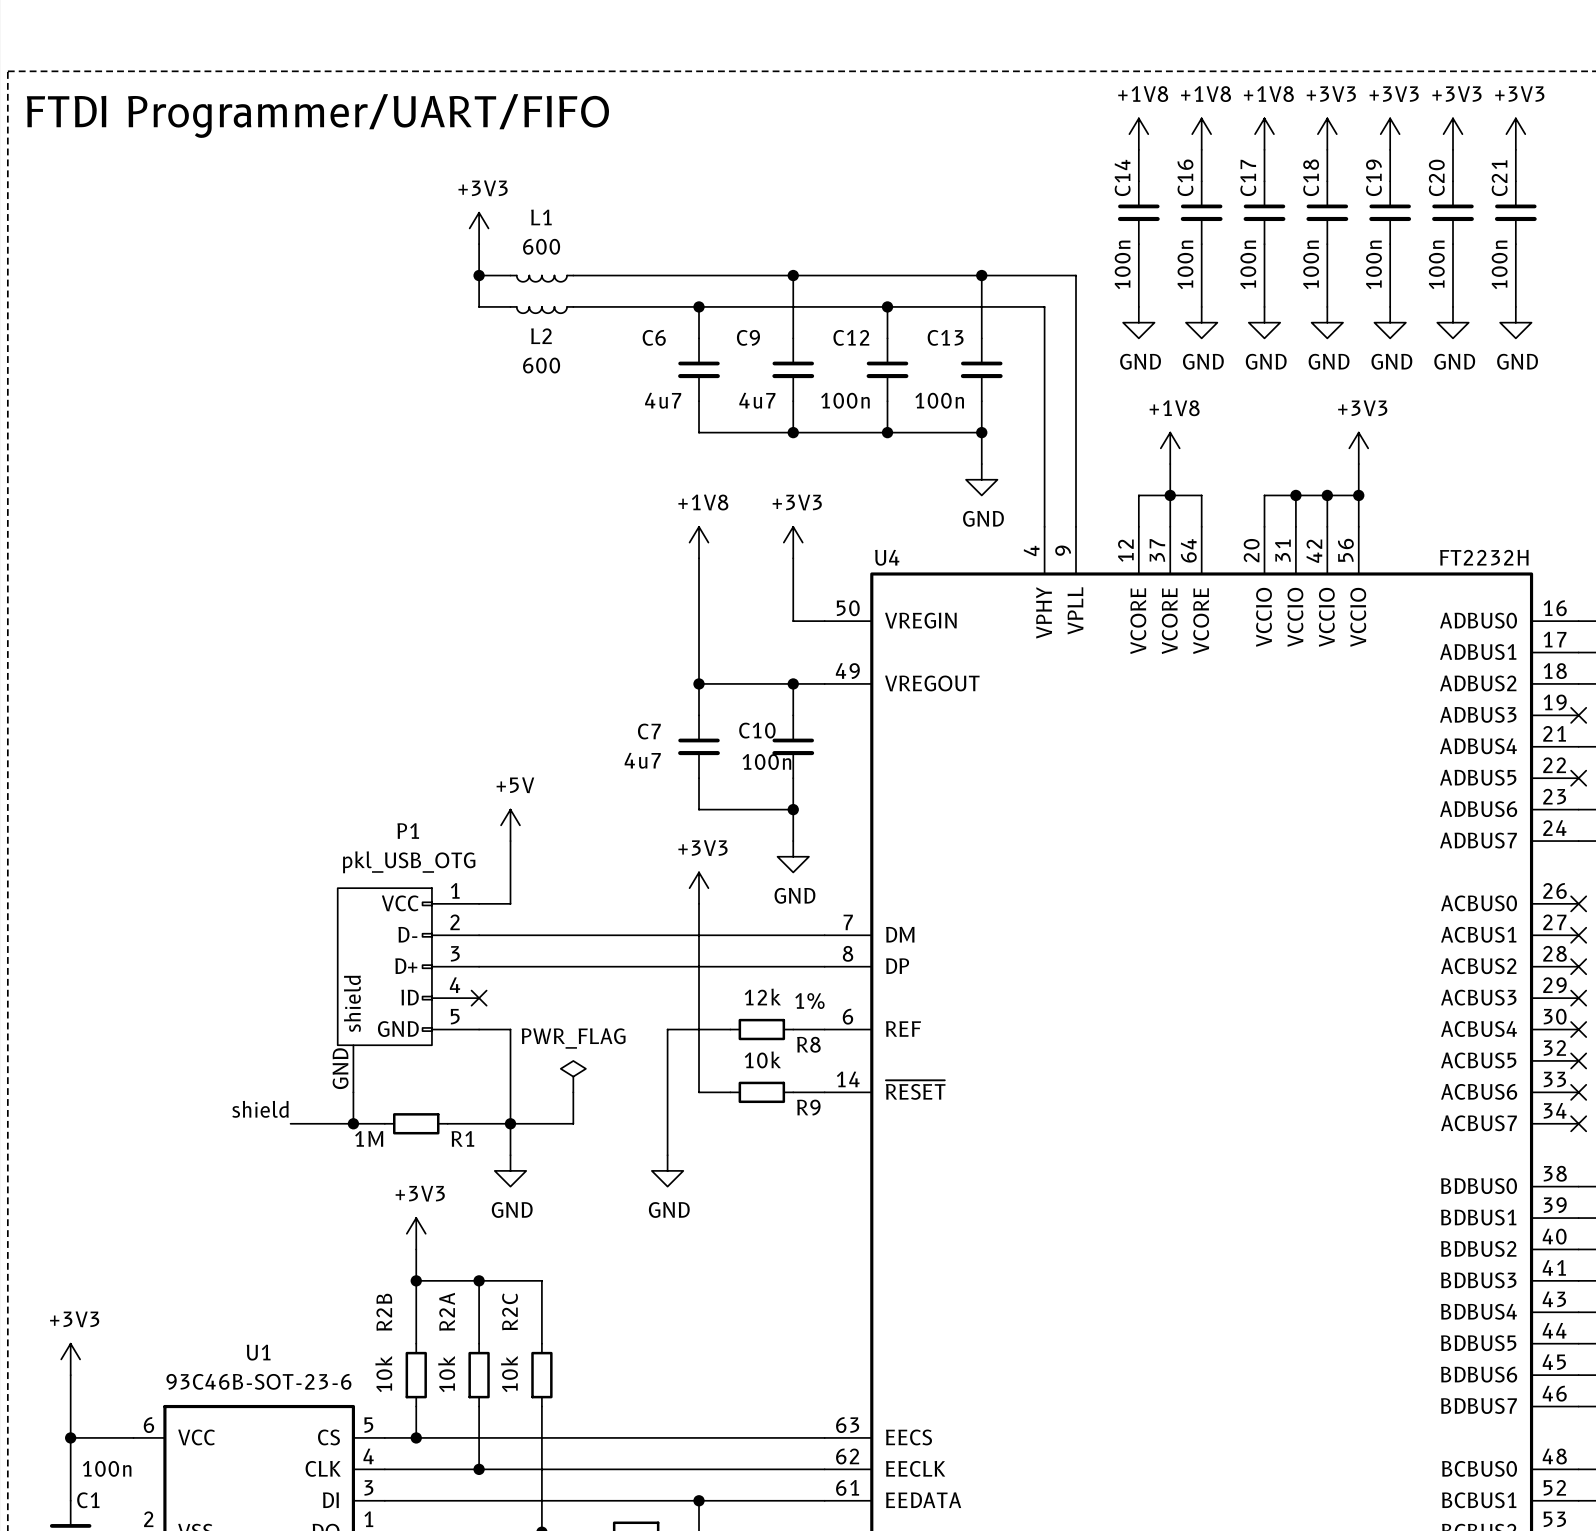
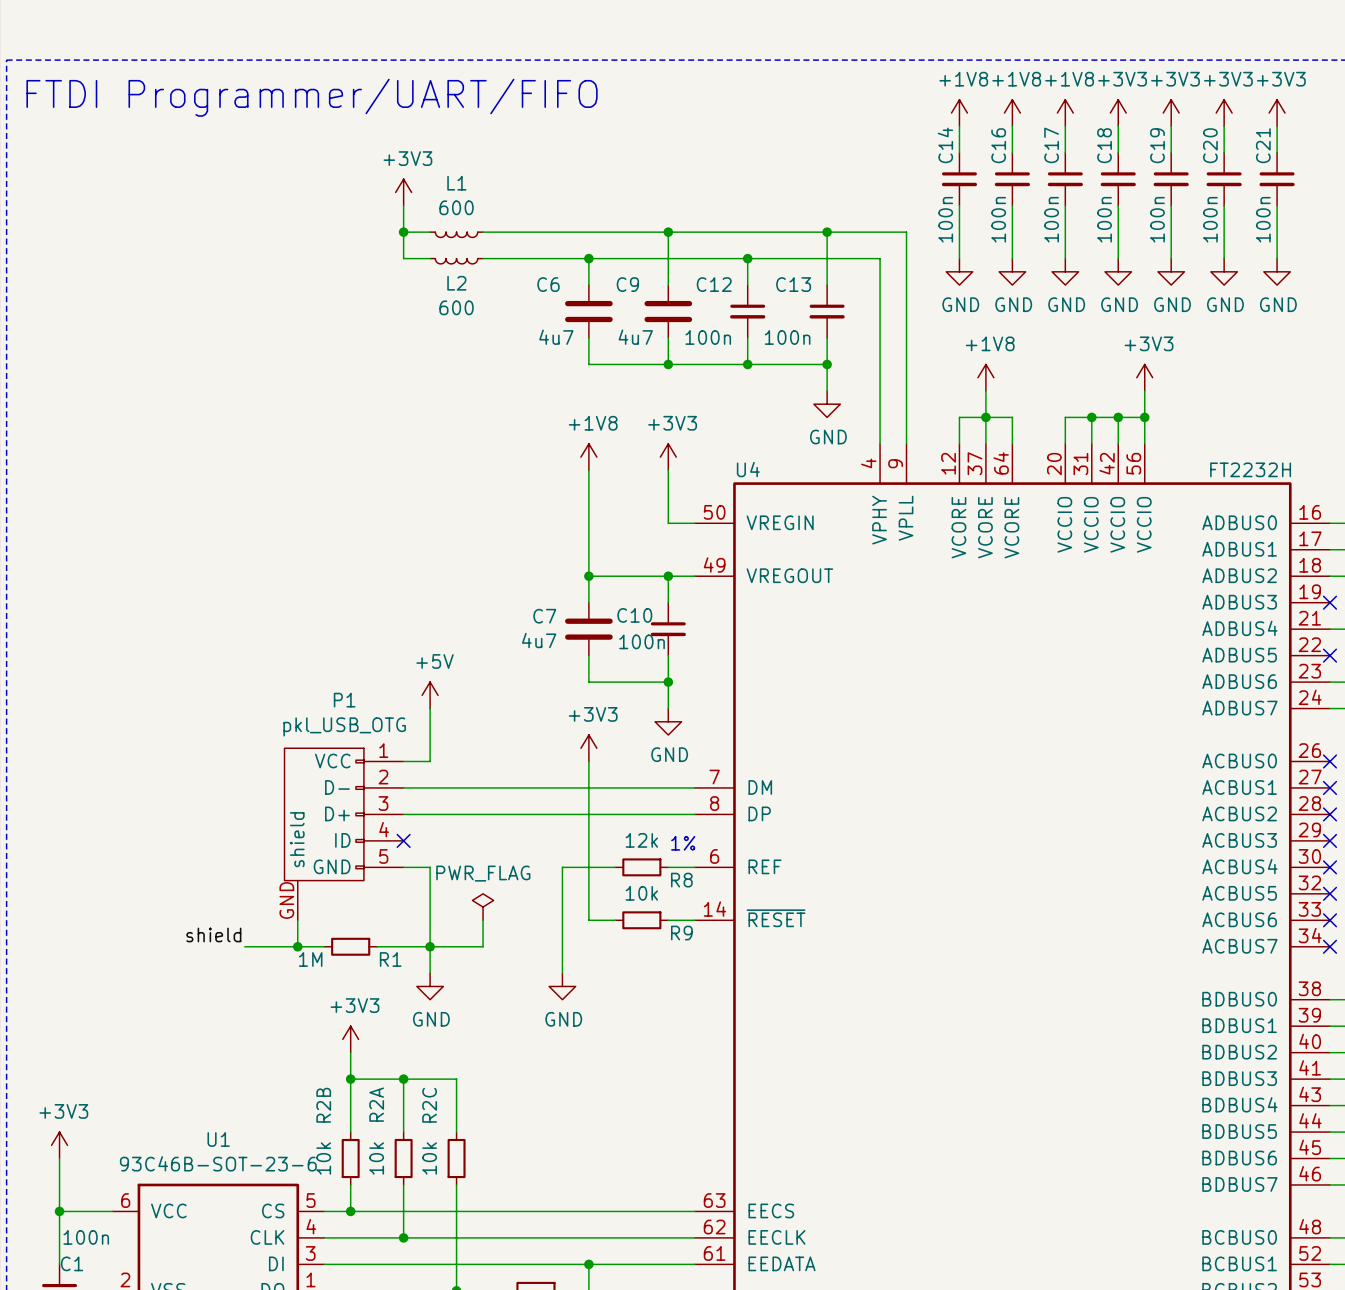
C6 symbol: [678, 338, 720, 402] -> [565, 285, 613, 339]
C9 symbol: [772, 338, 815, 402] -> [644, 285, 693, 339]
C7 symbol: [678, 715, 720, 779] -> [565, 602, 613, 656]

